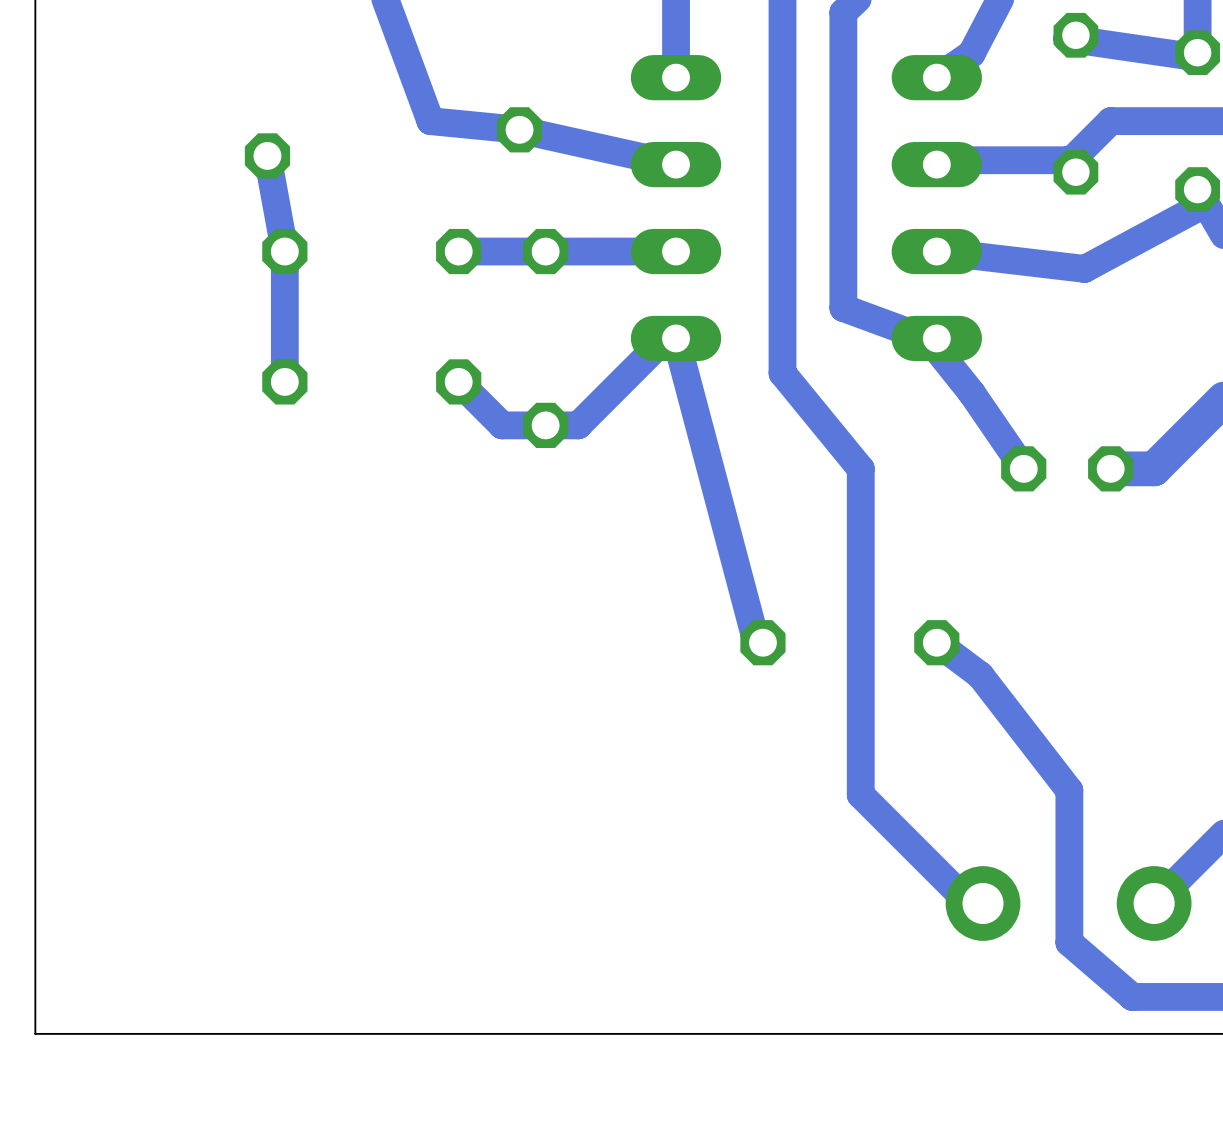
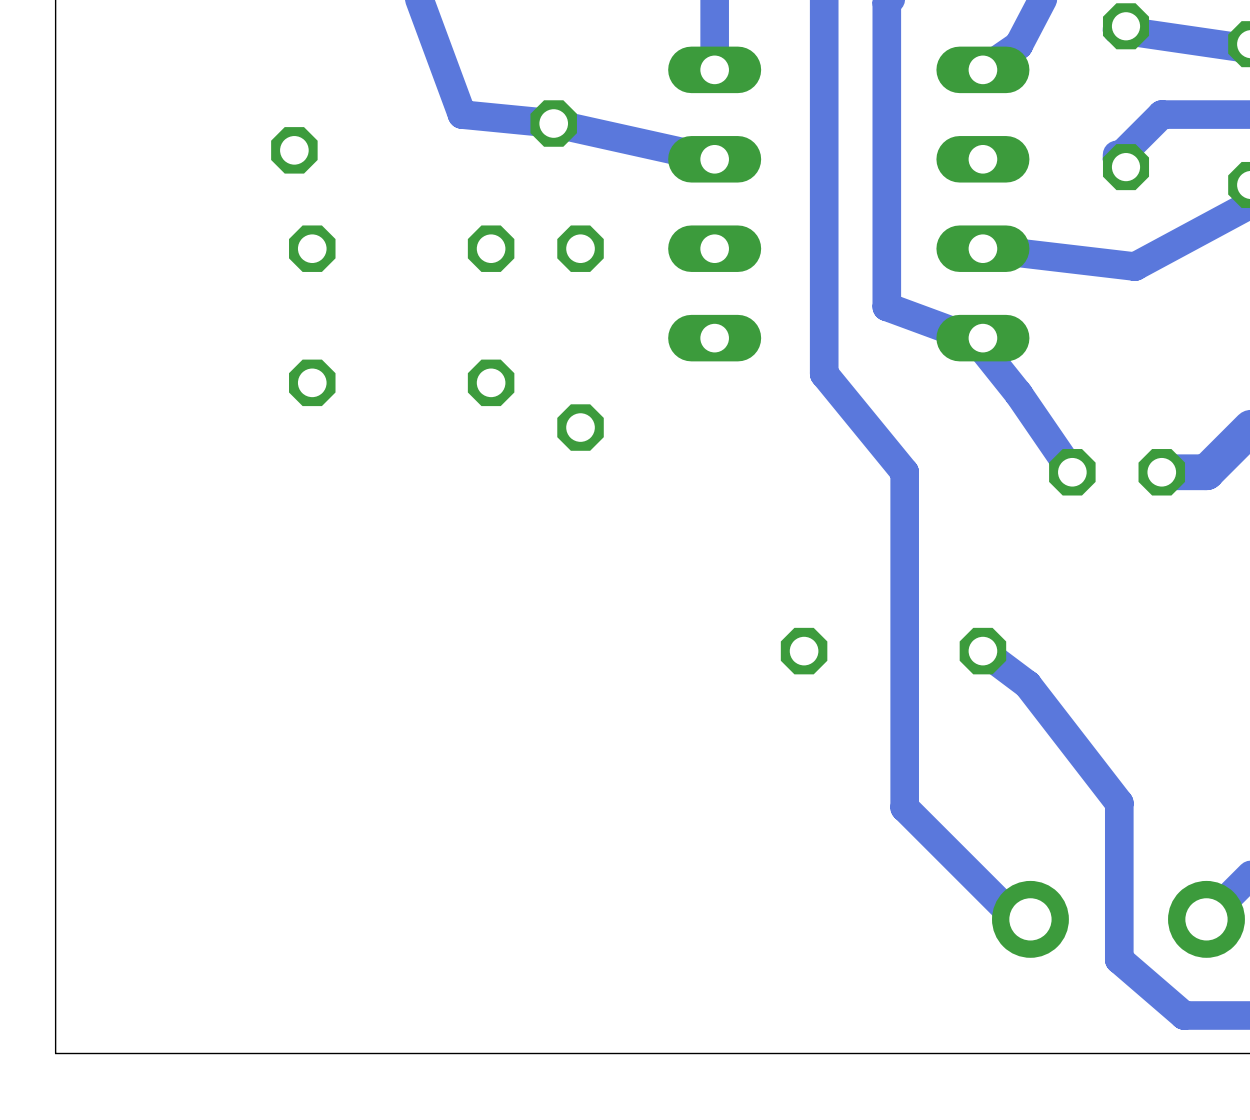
track: (267, 155) (284, 251) (284, 381) -> none
track: (936, 164) (958, 160) (1067, 160) (1075, 172) -> none
track: (676, 251) (458, 251) -> none
track: (458, 381) (502, 425) (578, 425) (665, 338) (676, 338) (754, 634) (762, 642) -> none

